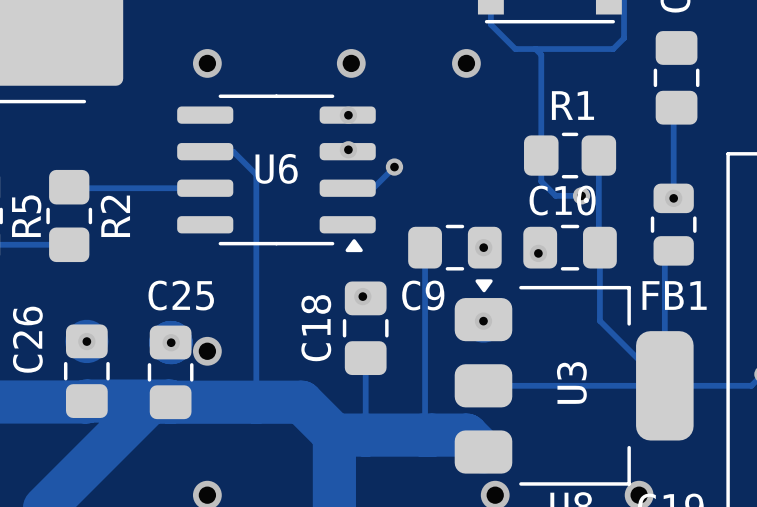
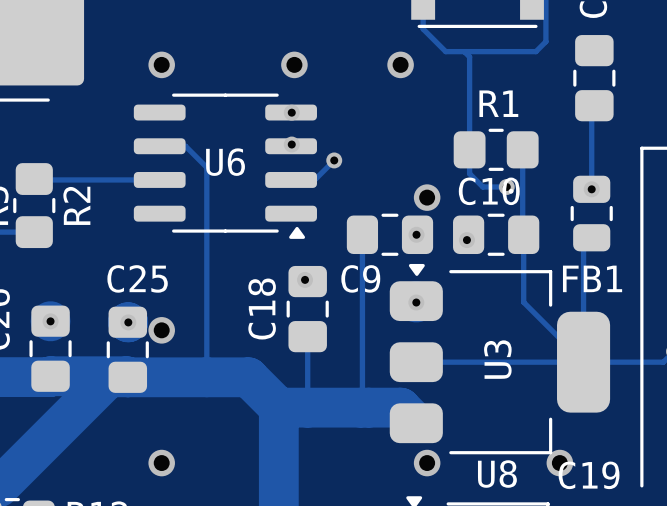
via: none -> (427, 197)

